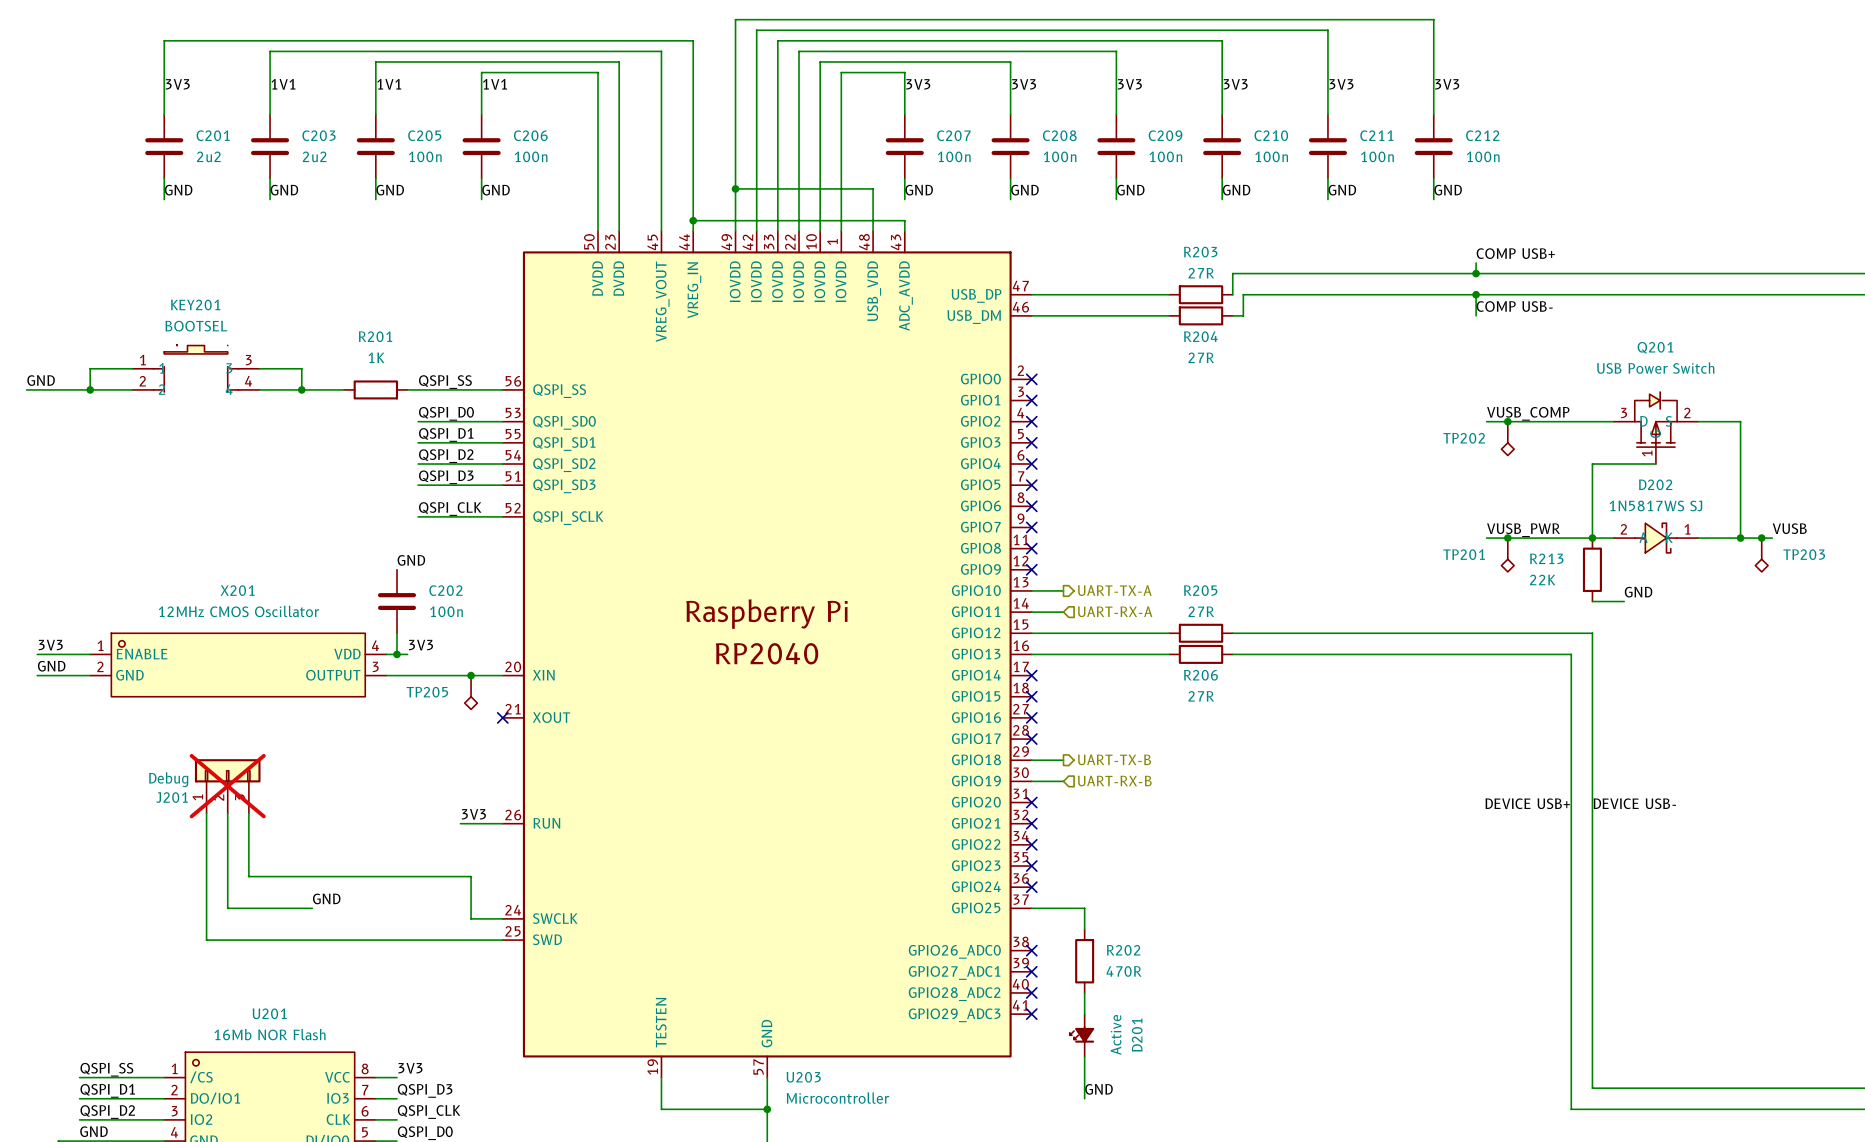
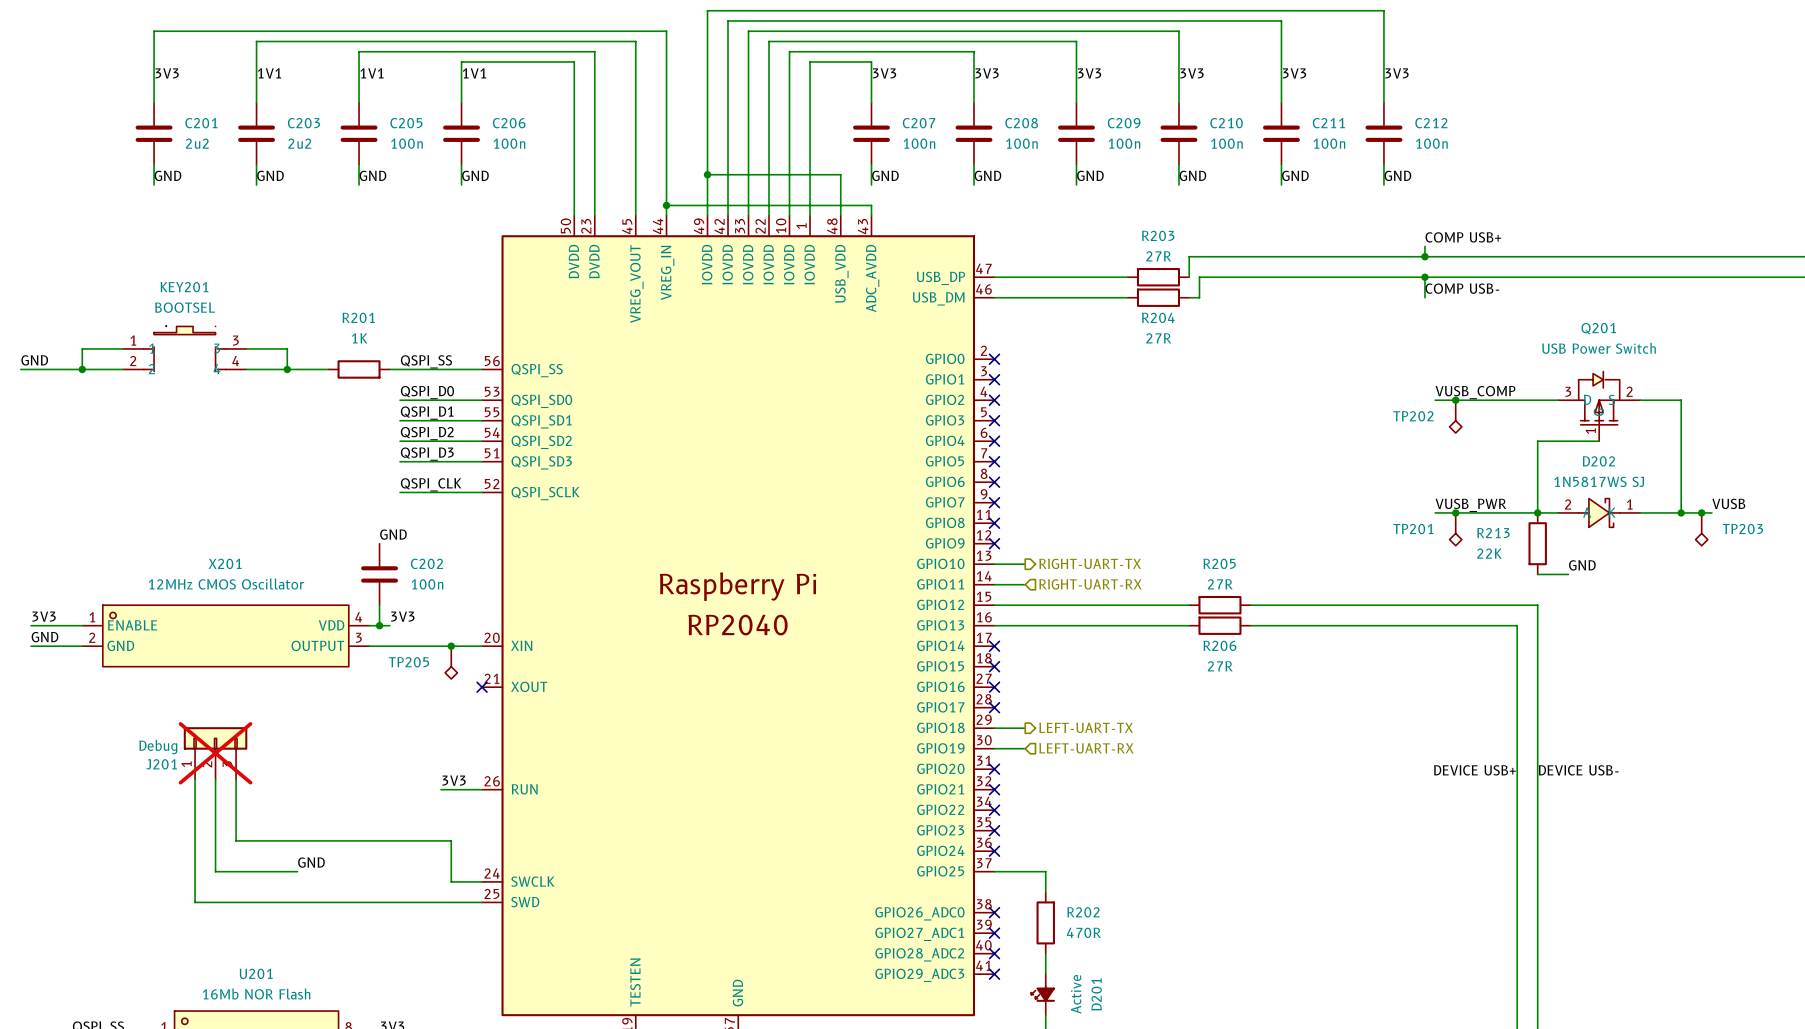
hierarchical label: UART-TX-A (1114, 590) -> RIGHT-UART-TX (1090, 563)
hierarchical label: UART-RX-A (1115, 611) -> RIGHT-UART-RX (1090, 584)
R206 position: (1201, 633) -> (1219, 605)
wire: (1232, 633) (1296, 633) -> (1189, 605) (1127, 605)
R205 position: (1201, 654) -> (1219, 625)
wire: (1232, 654) (1296, 654) -> (1189, 625) (1127, 625)
hierarchical label: UART-TX-B (1114, 759) -> LEFT-UART-TX (1086, 727)
hierarchical label: UART-RX-B (1114, 781) -> LEFT-UART-RX (1086, 748)

